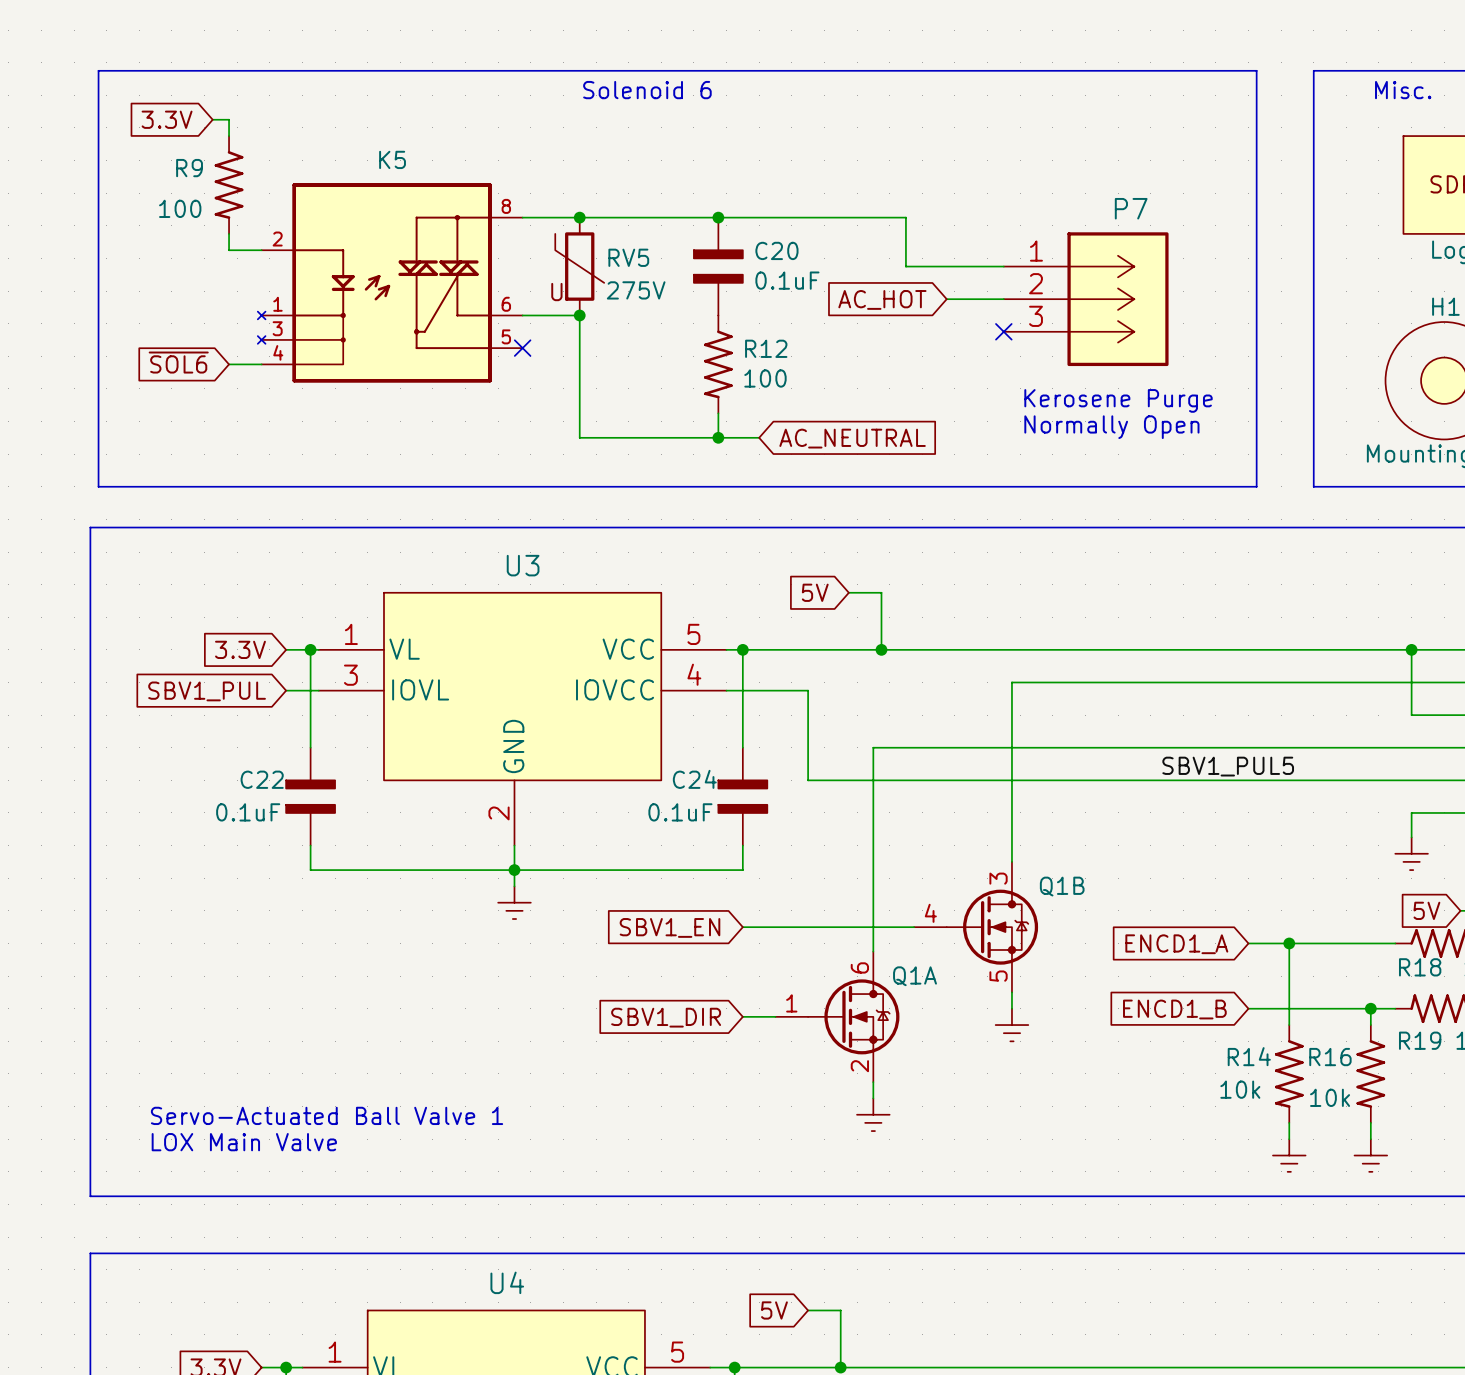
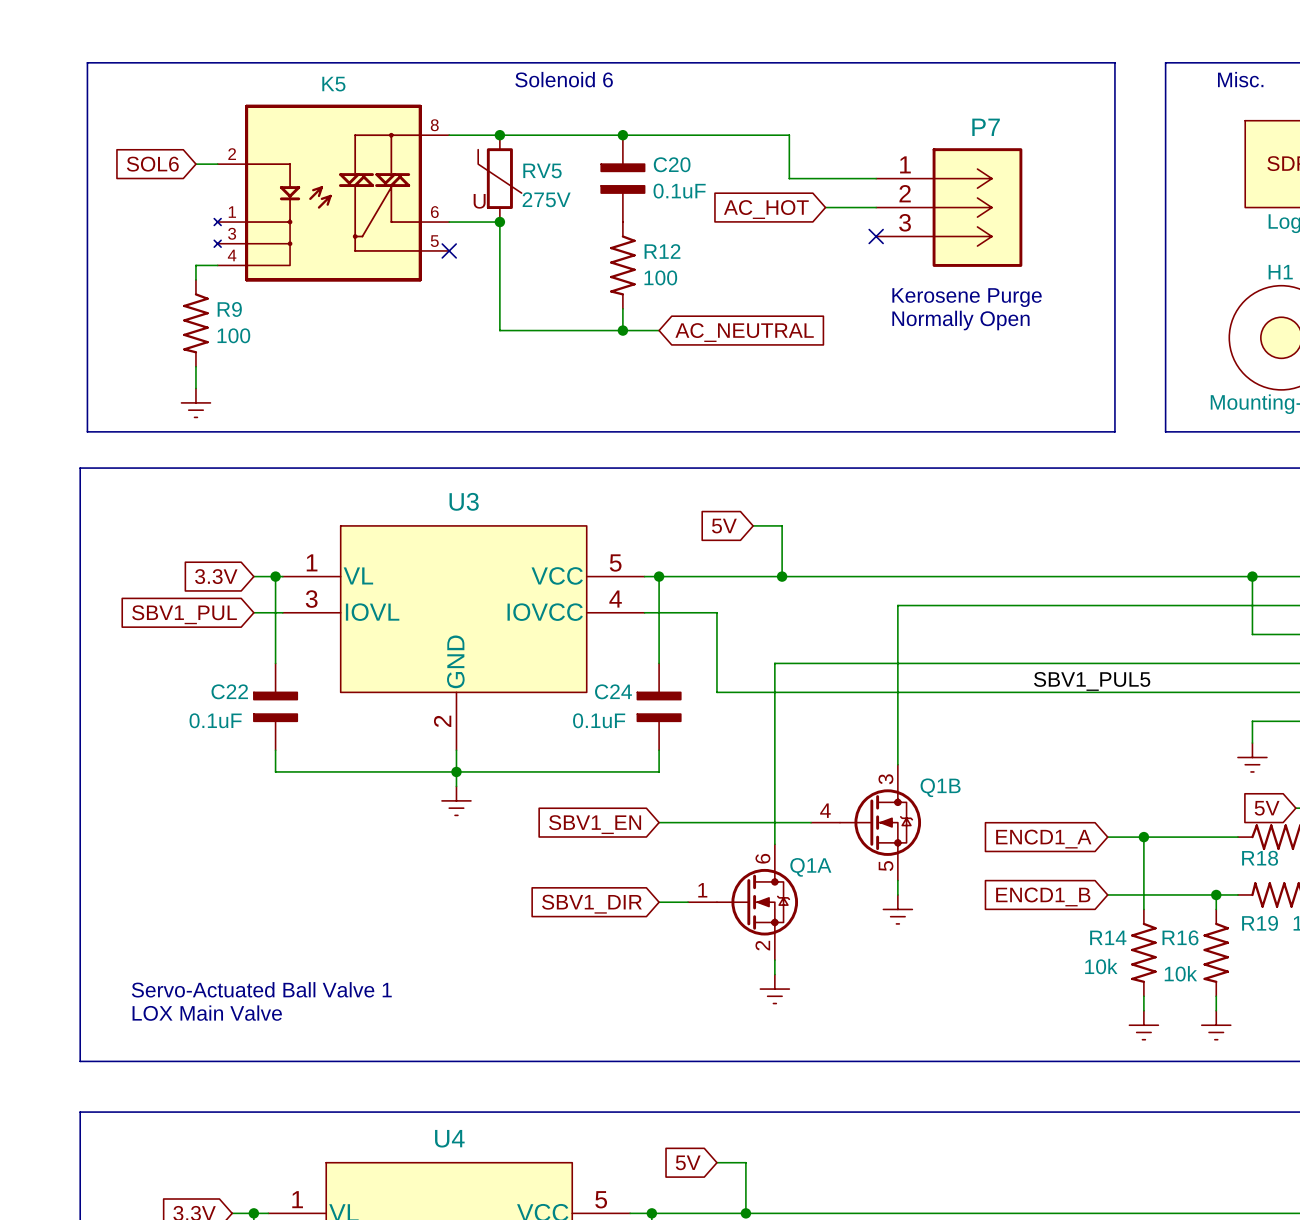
global label: 3.3V (167, 119) -> none
wire: (212, 119) (229, 119) (229, 136) -> none
junction: none -> (499, 135)
R9 name position: R9 (189, 168) -> R9 (229, 309)
global label: none -> SOL6 (152, 164)
wire: none -> (195, 164) (217, 164)
R9 position: (229, 184) -> (195, 323)
R9 value position: 100 (180, 208) -> 100 (233, 335)
wire: (522, 217) (905, 217) (905, 266) (1003, 266) -> (449, 135) (789, 135) (789, 178) (876, 178)
junction: (579, 217) -> none
junction position: (718, 217) -> (622, 135)
wire: (229, 233) (229, 250) (261, 250) -> none
junction: none -> (499, 222)
RV5 position: (579, 266) -> (499, 178)
C20 position: (718, 266) -> (622, 178)
K5 position: (390, 282) -> (331, 193)
wire: none -> (217, 265) (195, 265) (195, 279)
global label position: AC_HOT (882, 299) -> AC_HOT (766, 209)
wire: (946, 299) (1003, 299) -> (825, 207) (876, 207)
P7 position: (1086, 299) -> (949, 207)
wire: (522, 315) (579, 315) (579, 437) (759, 437) -> (449, 222) (499, 222) (499, 330) (659, 330)
junction: (579, 315) -> none
no-connect mark position: (1003, 331) -> (876, 236)
no-connect mark position: (522, 348) -> (449, 250)
global label: ~{SOL6} (178, 362) -> none
wire: (229, 364) (261, 364) -> none
R12 position: (718, 364) -> (622, 265)
text position: Kerosene Purge (1118, 400) -> Kerosene Purge (967, 297)
wire: none -> (195, 366) (195, 388)
wire: (718, 413) (718, 437) -> (622, 308) (622, 330)
text position: Normally Open (1111, 427) -> Normally Open (960, 320)
junction position: (718, 437) -> (622, 330)
global label position: AC_NEUTRAL (852, 438) -> AC_NEUTRAL (744, 332)
power symbol: none -> (195, 402)

